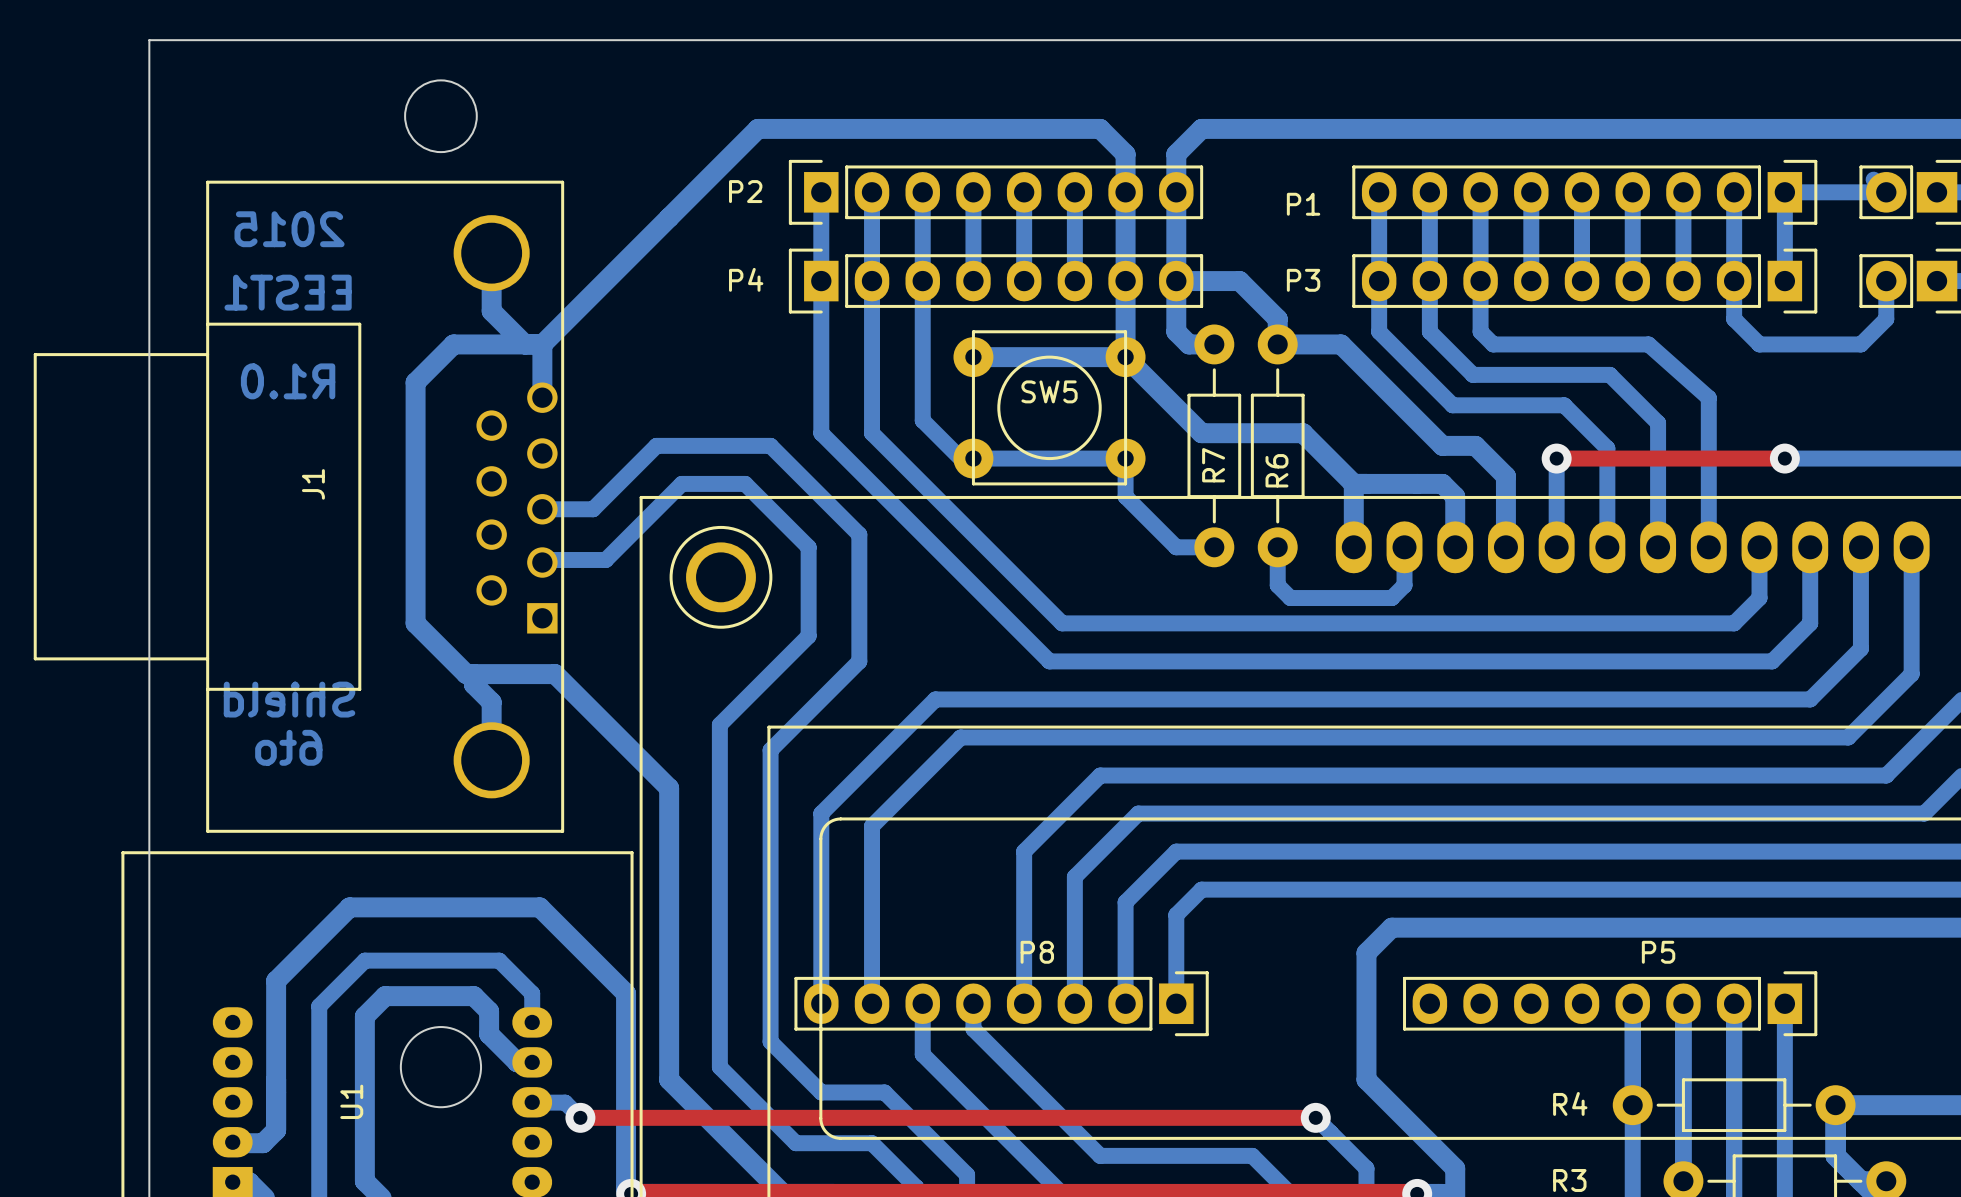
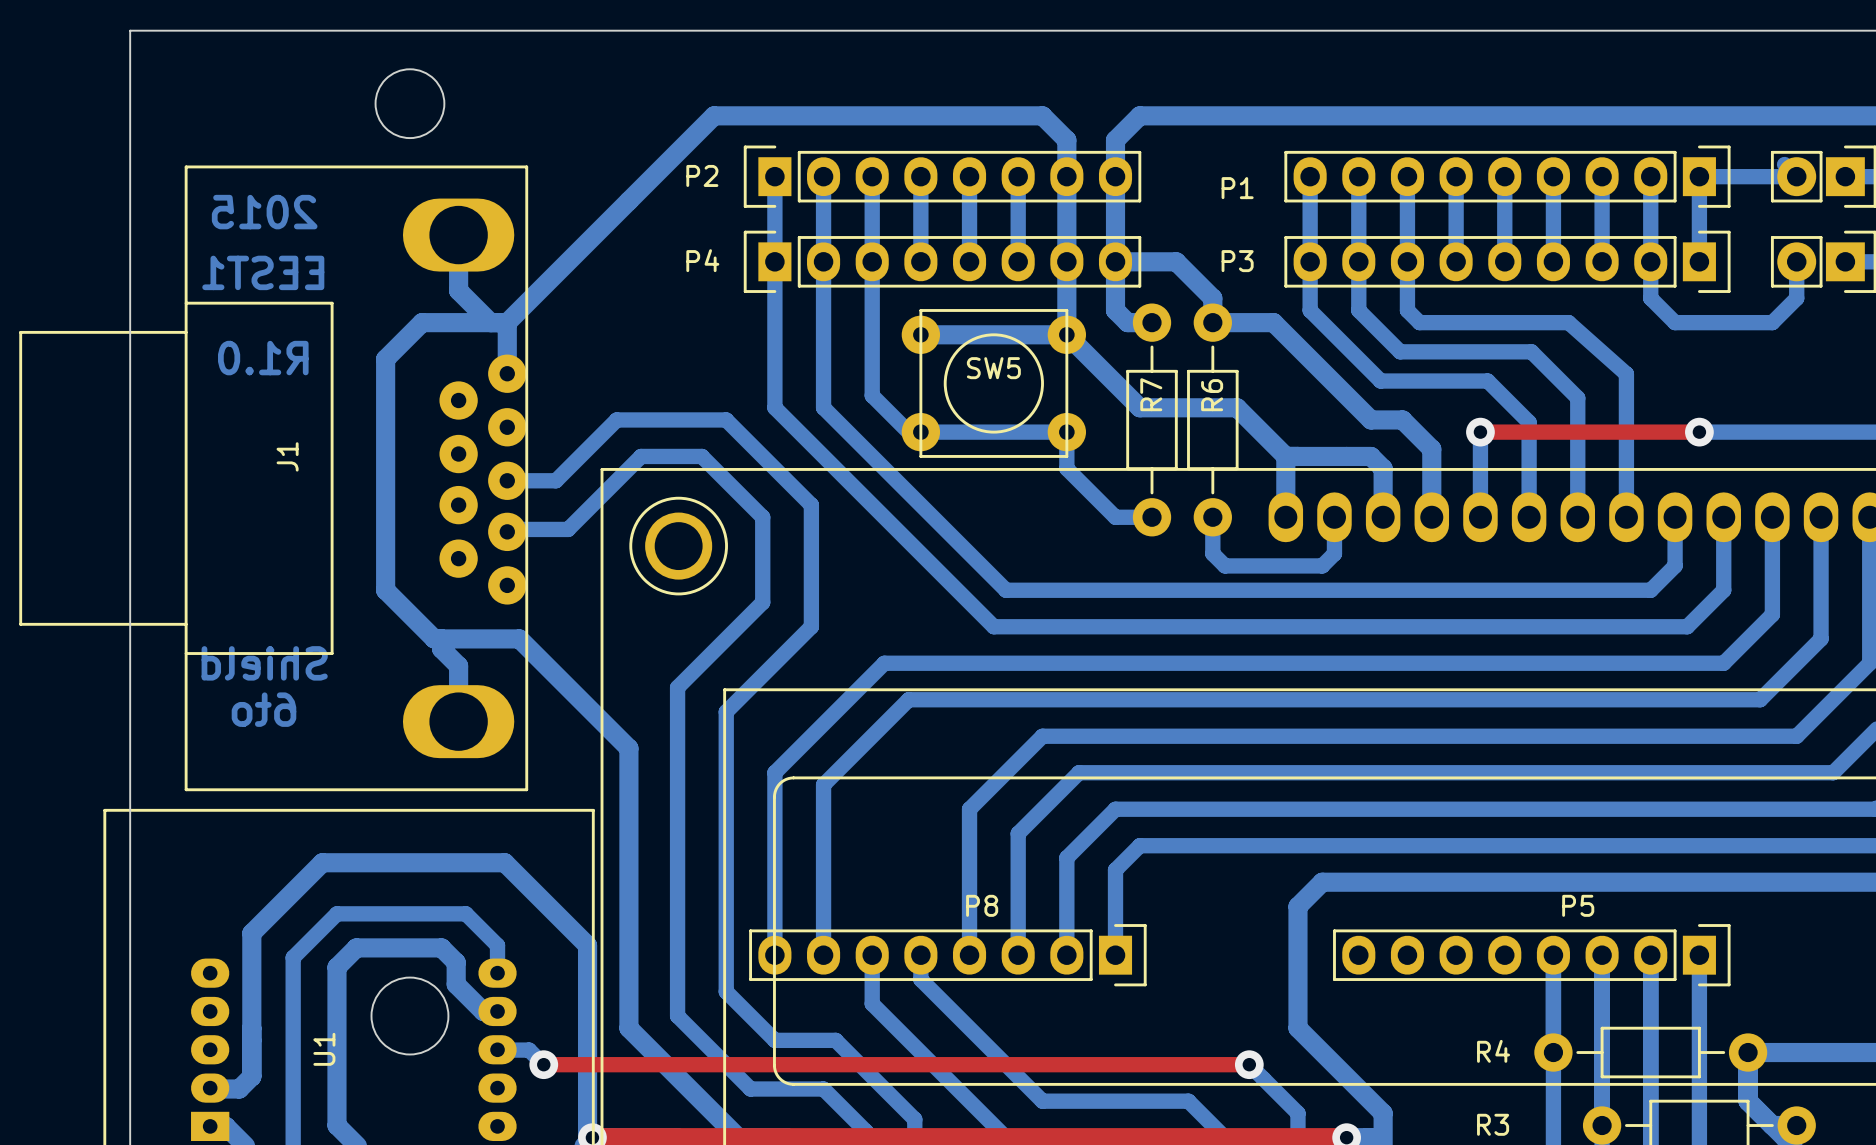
J1 footprint: [33, 180, 565, 833] -> [19, 165, 529, 792]
R7 name position: R7 (1213, 465) -> R7 (1151, 394)
R6 name position: R6 (1276, 470) -> R6 (1212, 395)

